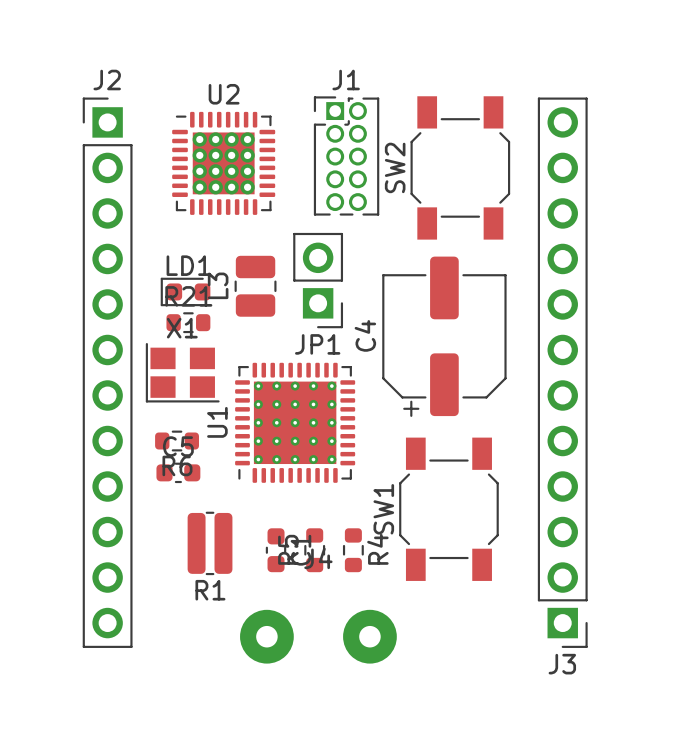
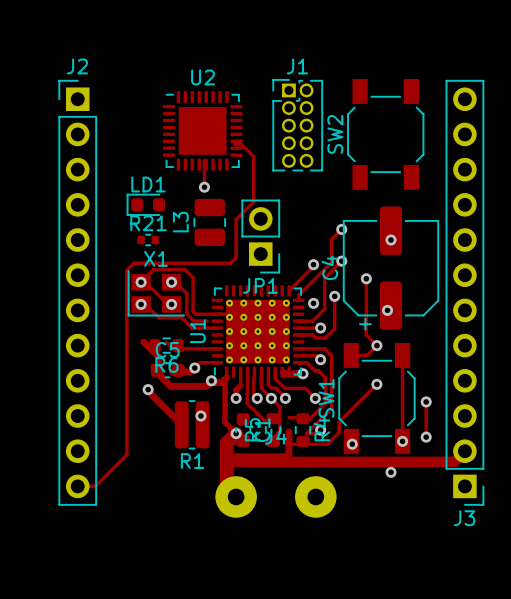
via: (199, 139) -> none
via: (215, 139) -> none
via: (231, 139) -> none
via: (247, 139) -> none
via: (199, 155) -> none
via: (215, 155) -> none
via: (231, 155) -> none
via: (247, 155) -> none
via: (199, 171) -> none
via: (215, 171) -> none
via: (231, 171) -> none
via: (247, 171) -> none
track: none -> (234, 144) (241, 144) (253, 156) (253, 201) (236, 219) (236, 257) (230, 263) (134, 263) (126, 270) (126, 454) (95, 486) (77, 486)
via: (199, 187) -> none
via: (215, 187) -> none
via: (231, 187) -> none
via: (247, 187) -> none
track: none -> (204, 160) (204, 187)
via: none -> (204, 187)
JP1 position: (318, 280) -> (260, 236)
L3 position: (255, 286) -> (209, 222)
track: none -> (341, 229) (331, 239) (331, 262) (298, 295) (298, 300)
via: none -> (341, 229)
LD1 position: (185, 291) -> (145, 204)
via: none -> (391, 240)
R21 footprint: [166, 312, 211, 334] -> [137, 233, 159, 247]
track: none -> (341, 261) (324, 278) (324, 309) (312, 321) (298, 321)
via: none -> (341, 261)
track: none -> (313, 264) (289, 290)
via: none -> (313, 264)
C4 position: (444, 336) -> (391, 268)
track: none -> (366, 278) (366, 335) (376, 345) (367, 355) (351, 355)
via: none -> (366, 278)
via: none -> (141, 282)
track: none -> (171, 282) (175, 282) (186, 293) (186, 313) (193, 320) (207, 320)
via: none -> (171, 282)
J2 position: (107, 372) -> (77, 292)
X1 position: (182, 372) -> (156, 293)
track: none -> (334, 296) (334, 328) (325, 338) (315, 338) (312, 335) (298, 335)
via: none -> (334, 296)
via: none -> (313, 303)
track: none -> (141, 304) (145, 304) (158, 317) (181, 317) (192, 328) (217, 328)
via: none -> (141, 304)
track: none -> (171, 304) (167, 304) (145, 282) (141, 282) (153, 269) (184, 269) (193, 277) (193, 311) (195, 314) (240, 314)
via: none -> (171, 304)
via: none -> (387, 310)
track: none -> (298, 328) (320, 328)
via: none -> (320, 328)
track: none -> (143, 342) (159, 357) (159, 374) (170, 386) (205, 386) (211, 380) (221, 382) (226, 377) (225, 379) (225, 422) (236, 433) (226, 442) (226, 504)
track: none -> (166, 342) (173, 348) (217, 348)
via: none -> (376, 345)
track: none -> (298, 348) (324, 348) (331, 355) (331, 408) (306, 433) (317, 433) (320, 430)
track: none -> (402, 355) (402, 441)
track: none -> (298, 355) (316, 355) (320, 359)
via: none -> (320, 359)
track: none -> (217, 362) (200, 362) (190, 372) (172, 372)
track: none -> (299, 363) (306, 362) (325, 377) (325, 403) (309, 419) (288, 417)
via: none -> (194, 367)
track: none -> (275, 372) (275, 378) (285, 388) (305, 388) (315, 398)
track: none -> (283, 372) (303, 373) (301, 372)
via: none -> (303, 373)
track: none -> (240, 377) (240, 386)
track: none -> (247, 377) (247, 403) (266, 422)
track: none -> (254, 377) (253, 394) (257, 398)
track: none -> (261, 377) (261, 388) (271, 398)
track: none -> (268, 377) (268, 384) (271, 388) (276, 388) (285, 398)
via: none -> (211, 380)
track: none -> (376, 384) (339, 422) (339, 432) (327, 444) (288, 444)
via: none -> (376, 384)
track: none -> (240, 385) (236, 389) (236, 398)
track: none -> (148, 389) (181, 424) (181, 405)
via: none -> (148, 389)
via: none -> (236, 398)
via: none -> (257, 398)
track: none -> (271, 398) (279, 407) (279, 431) (266, 444)
via: none -> (271, 398)
via: none -> (285, 398)
via: none -> (315, 398)
track: none -> (426, 401) (426, 437)
via: none -> (426, 401)
via: none -> (200, 416)
via: none -> (320, 430)
track: none -> (288, 431) (288, 453) (285, 456) (229, 456) (226, 459) (229, 461) (454, 461) (464, 451)
via: none -> (236, 433)
via: none -> (426, 437)
via: none -> (402, 441)
via: none -> (352, 444)
via: none -> (391, 472)

